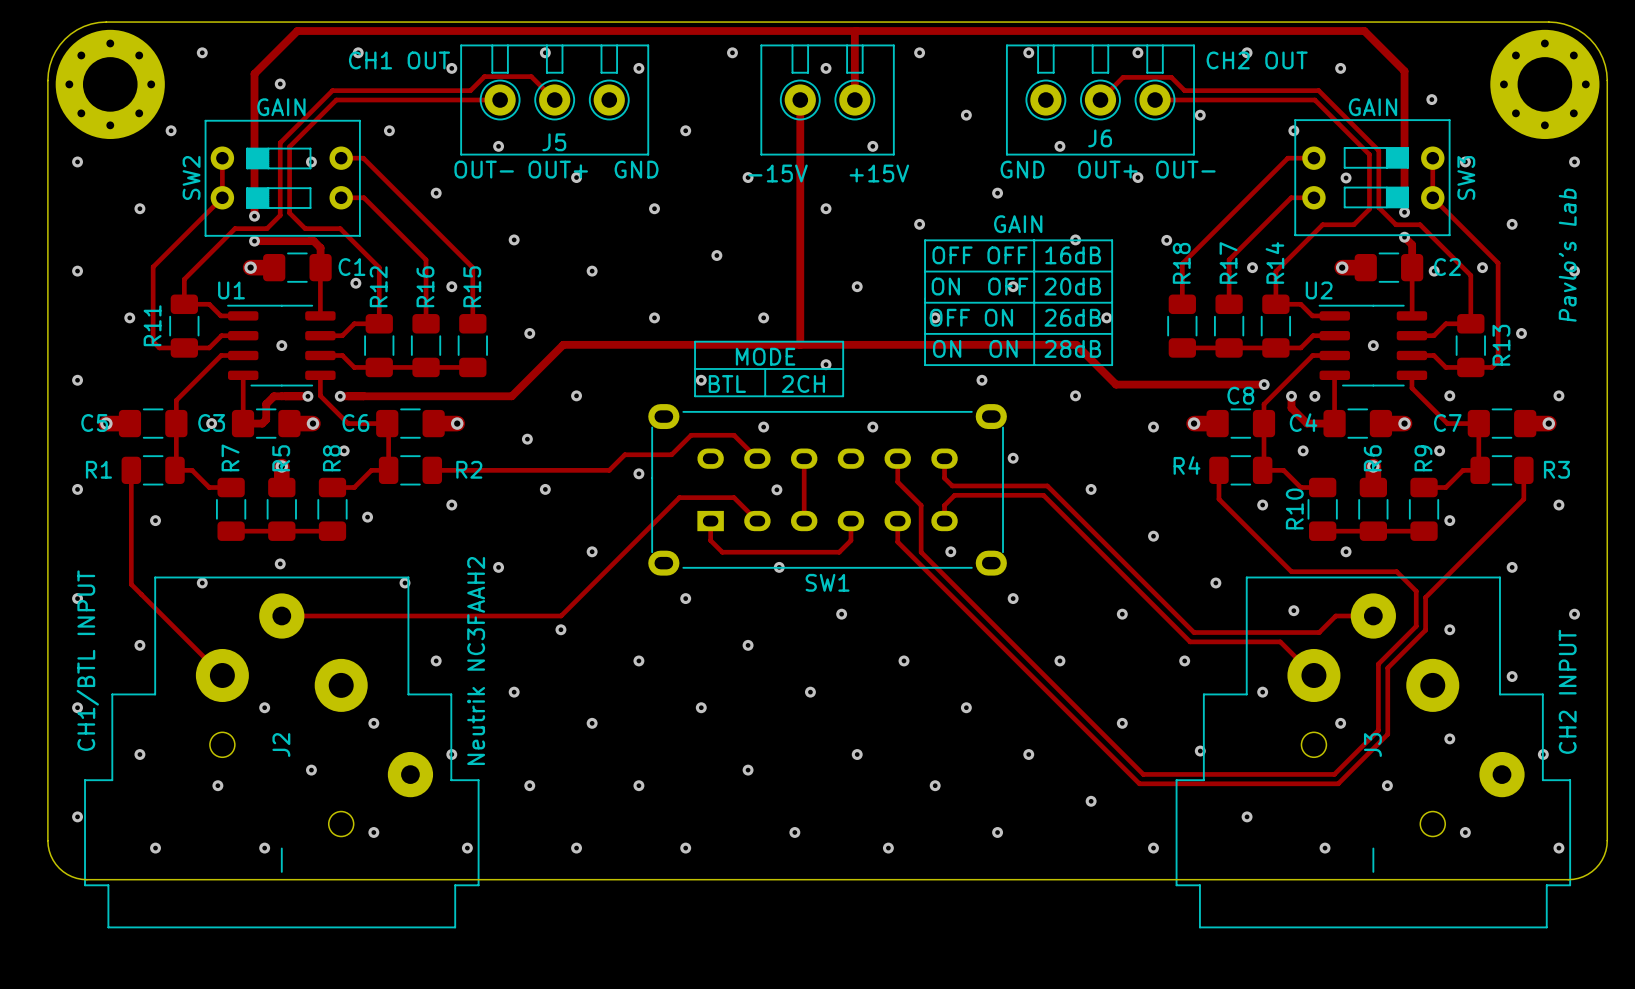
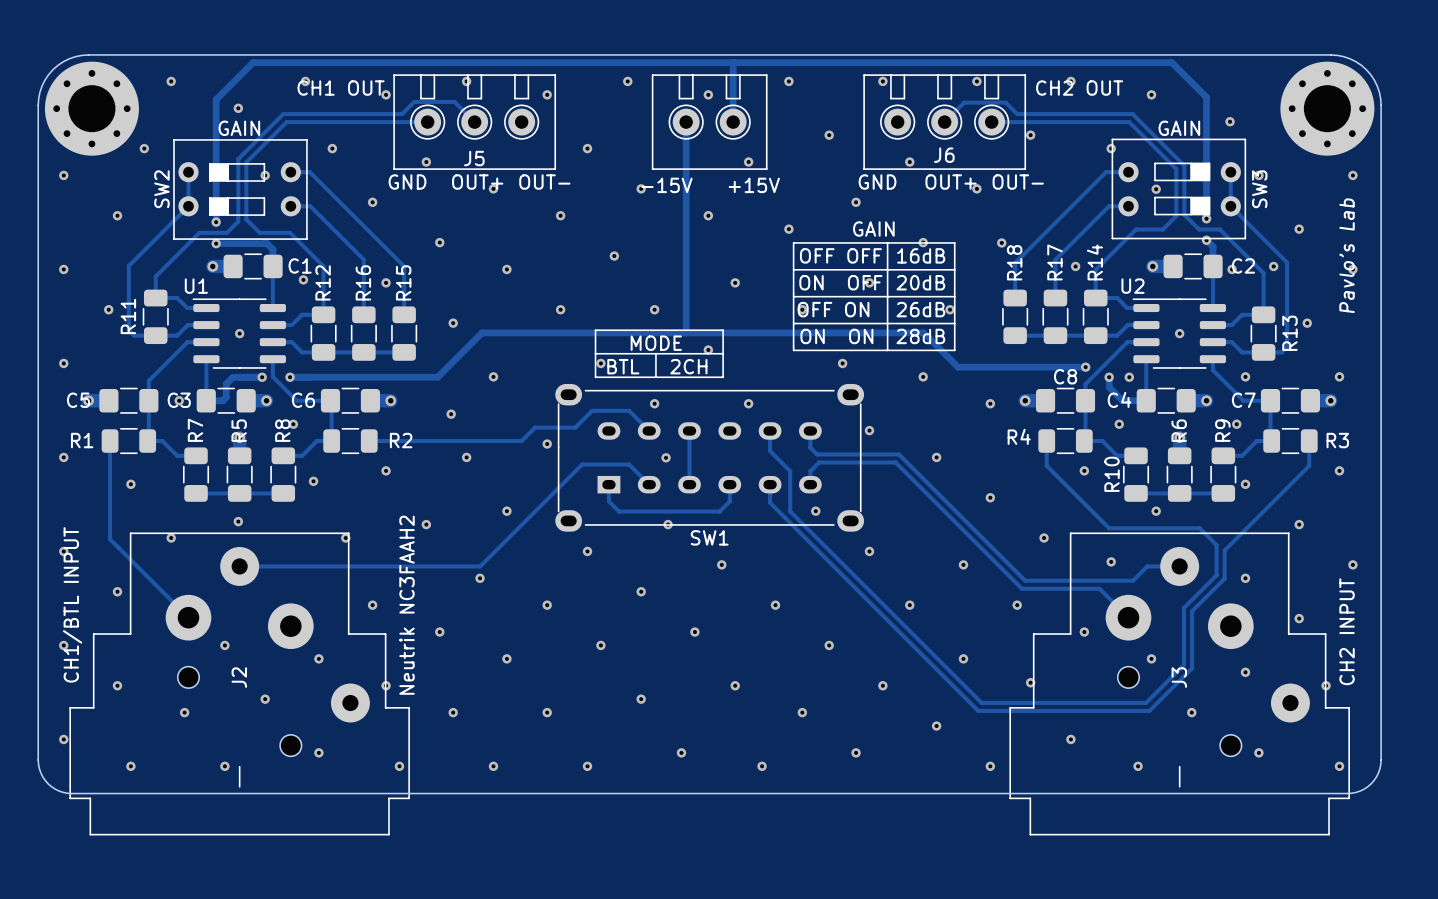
text: OUT- (484, 169) -> GND (407, 182)
text: GND (636, 169) -> OUT- (544, 182)

